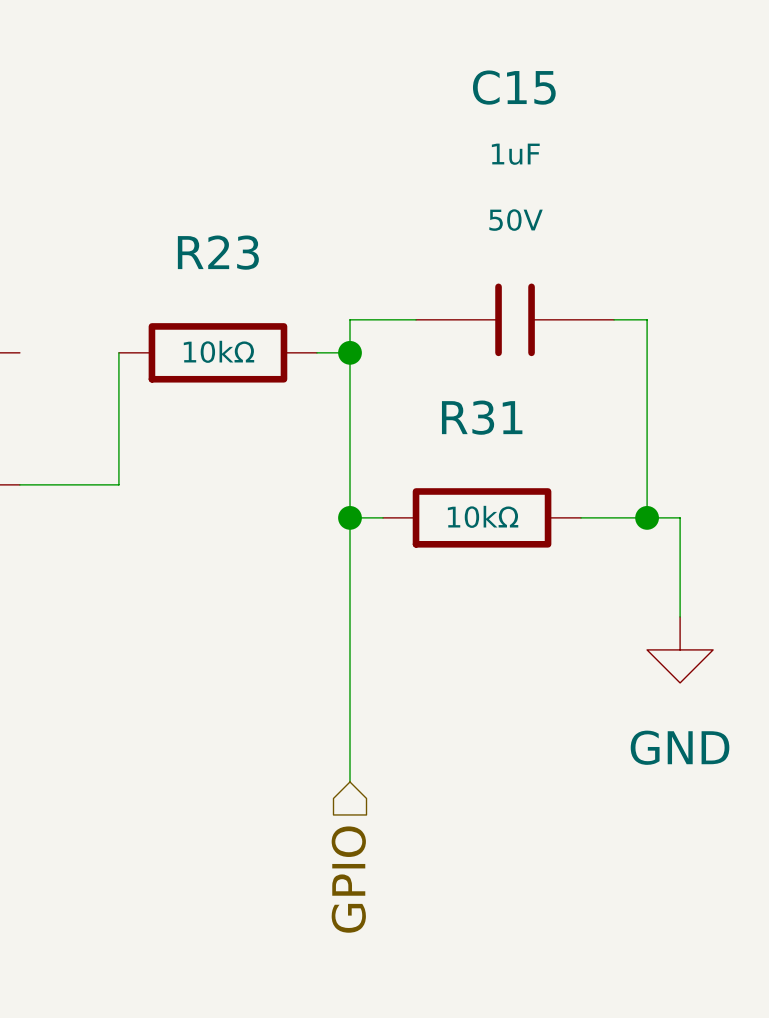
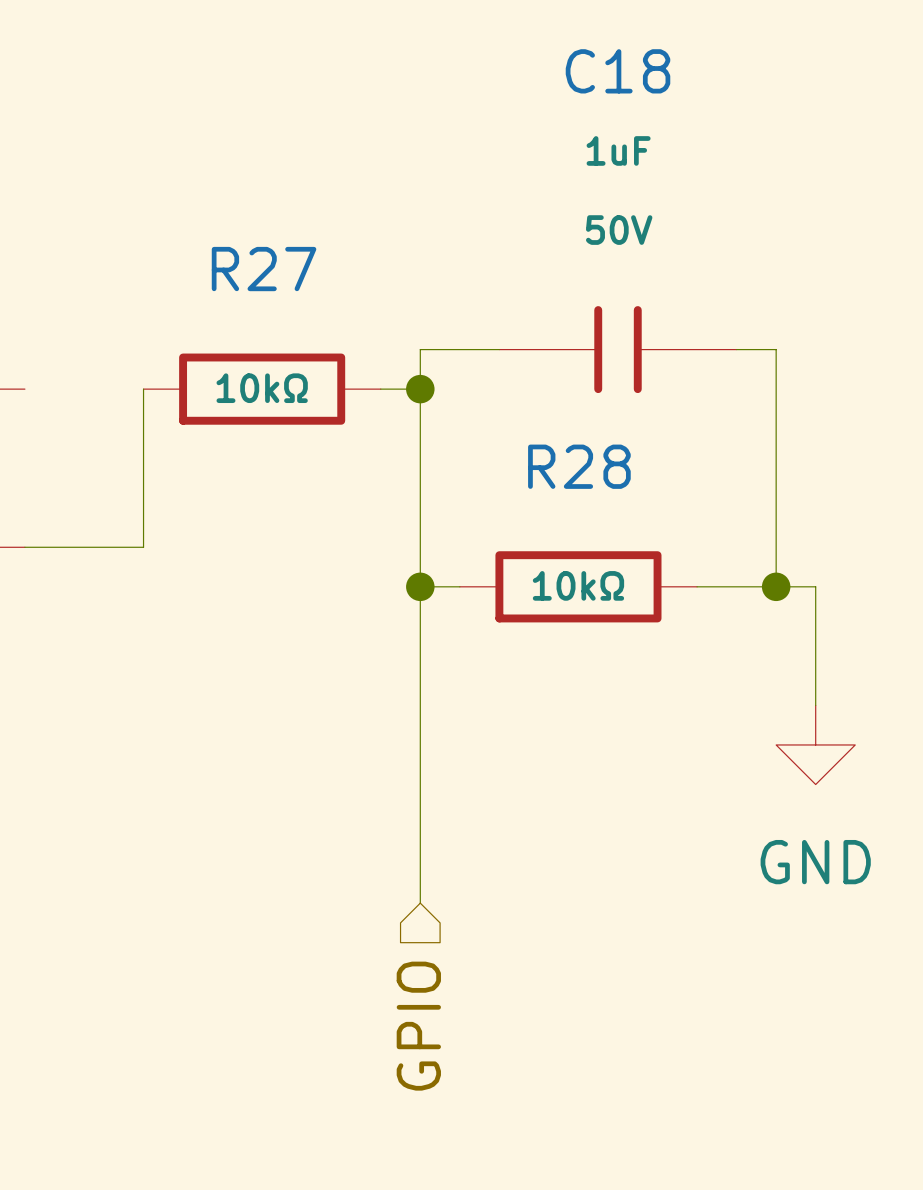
C15 name: C15 (514, 87) -> C18 (618, 71)
R23 name: R23 (218, 252) -> R27 (264, 269)
R31 name: R31 (482, 417) -> R28 (579, 466)

